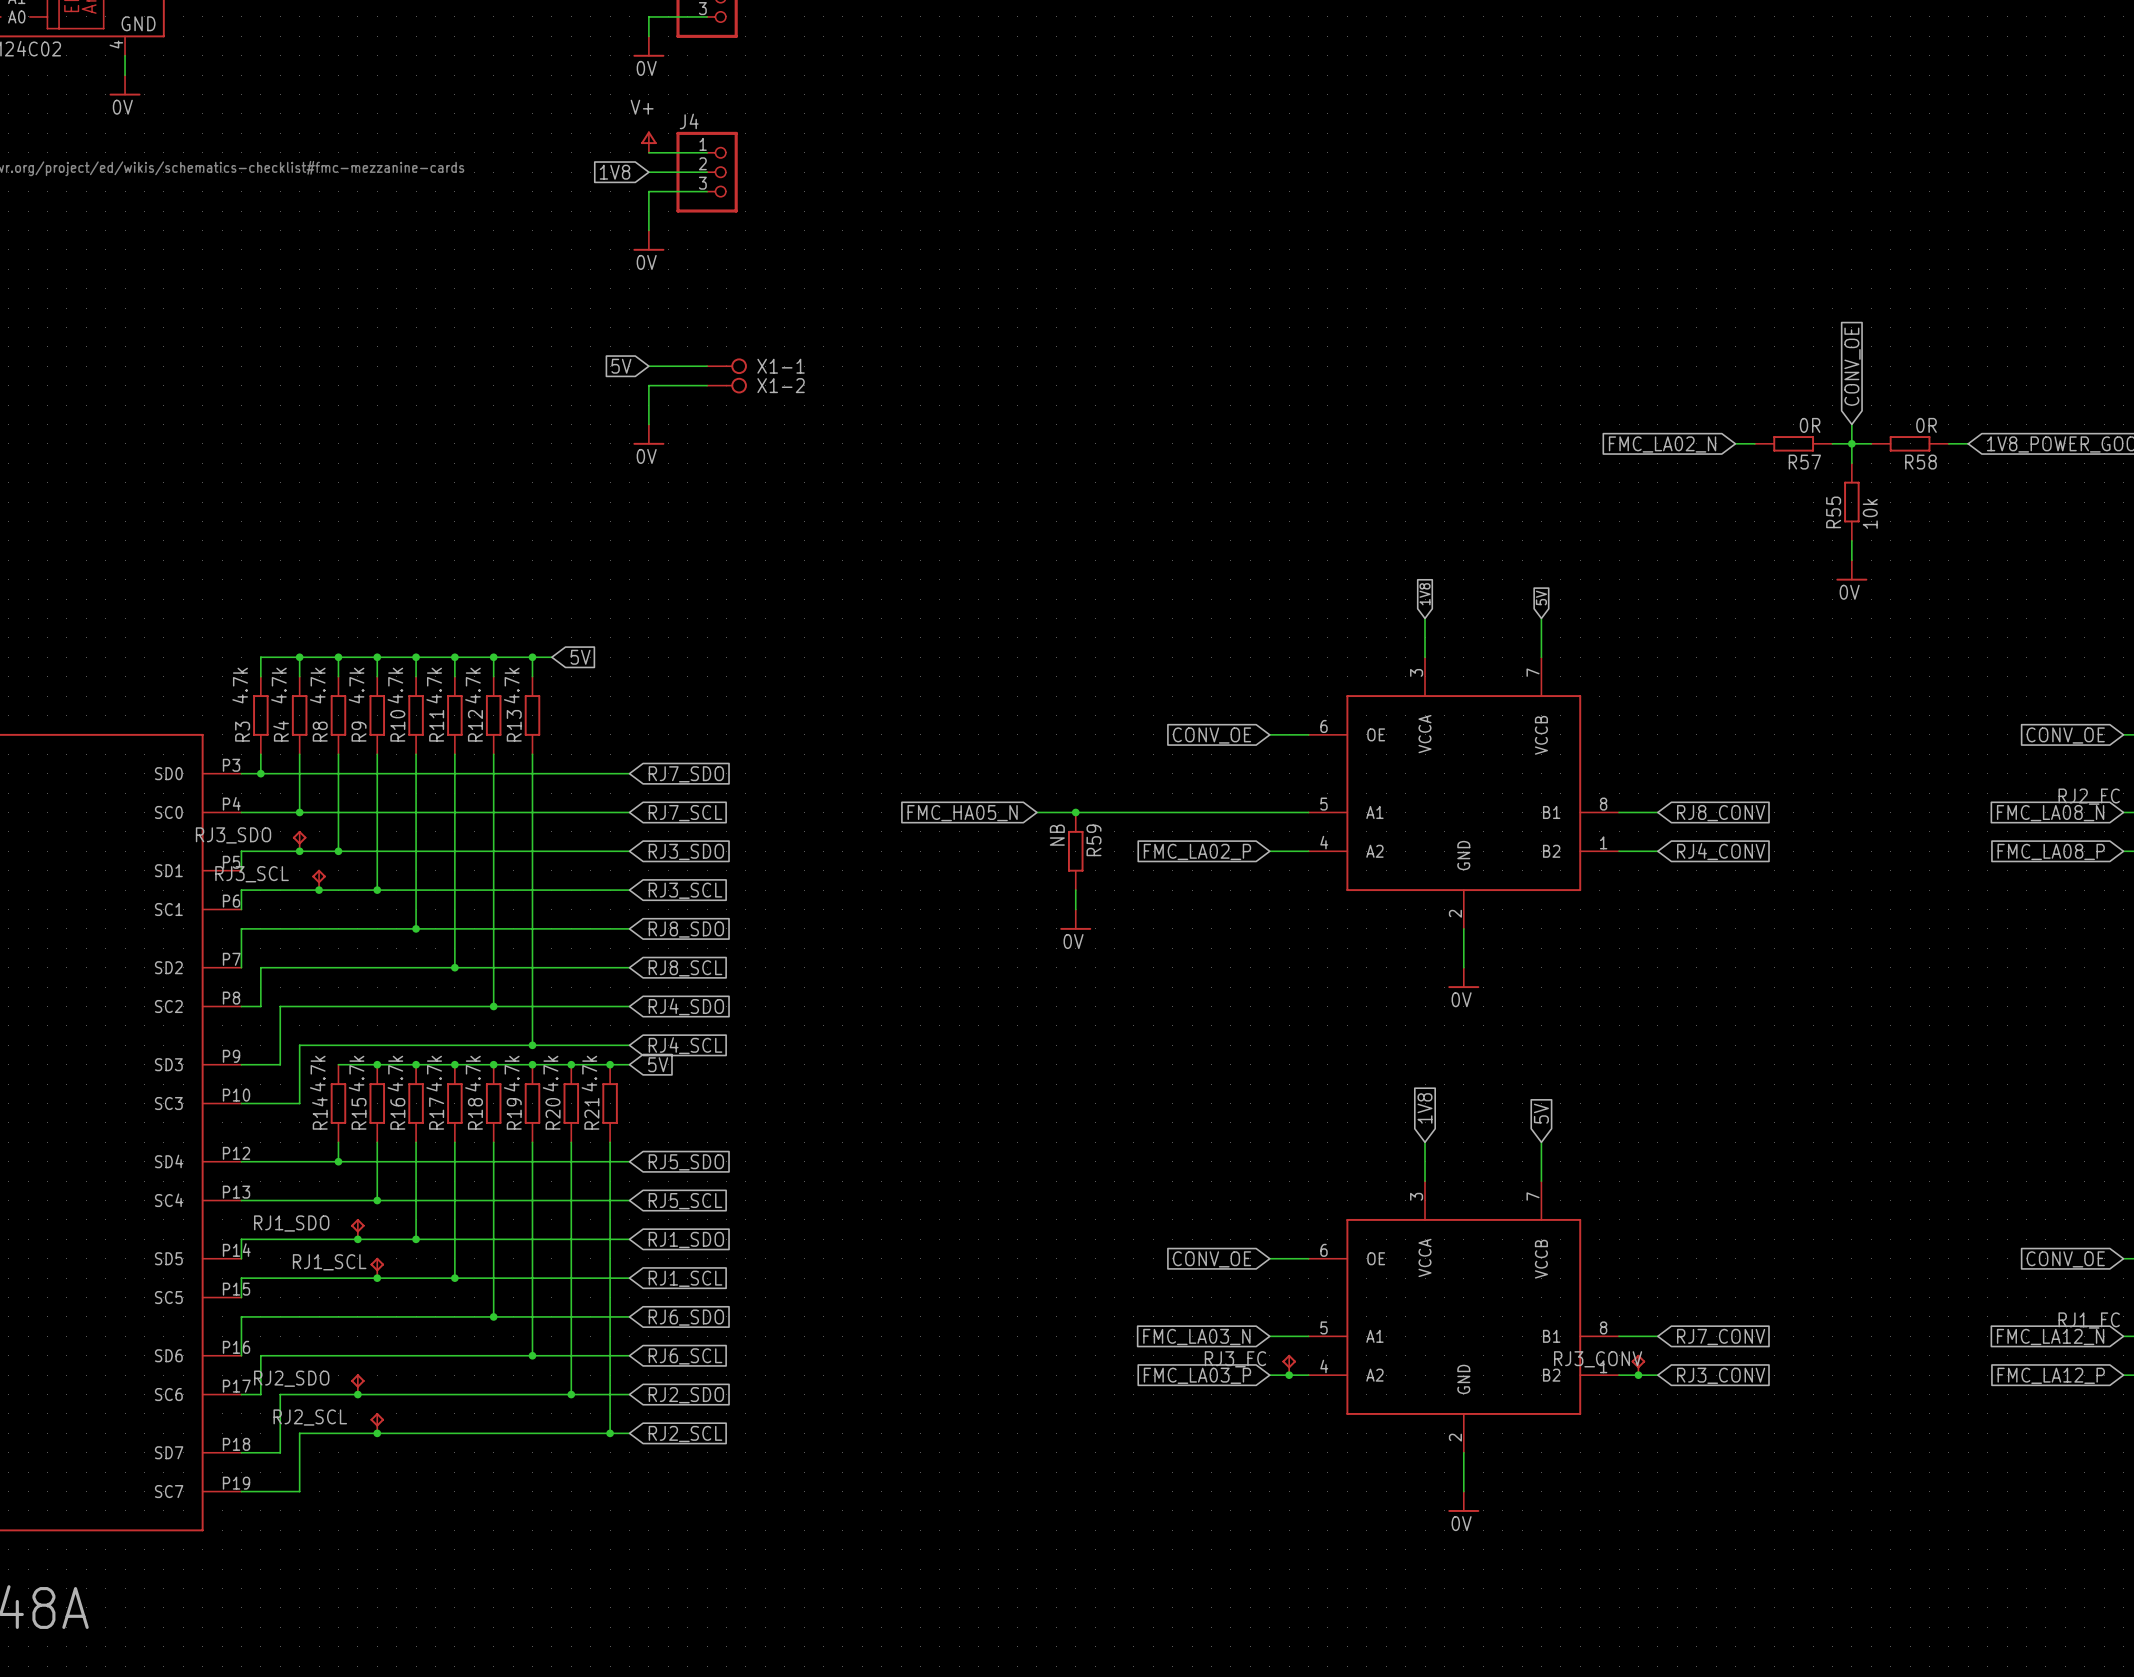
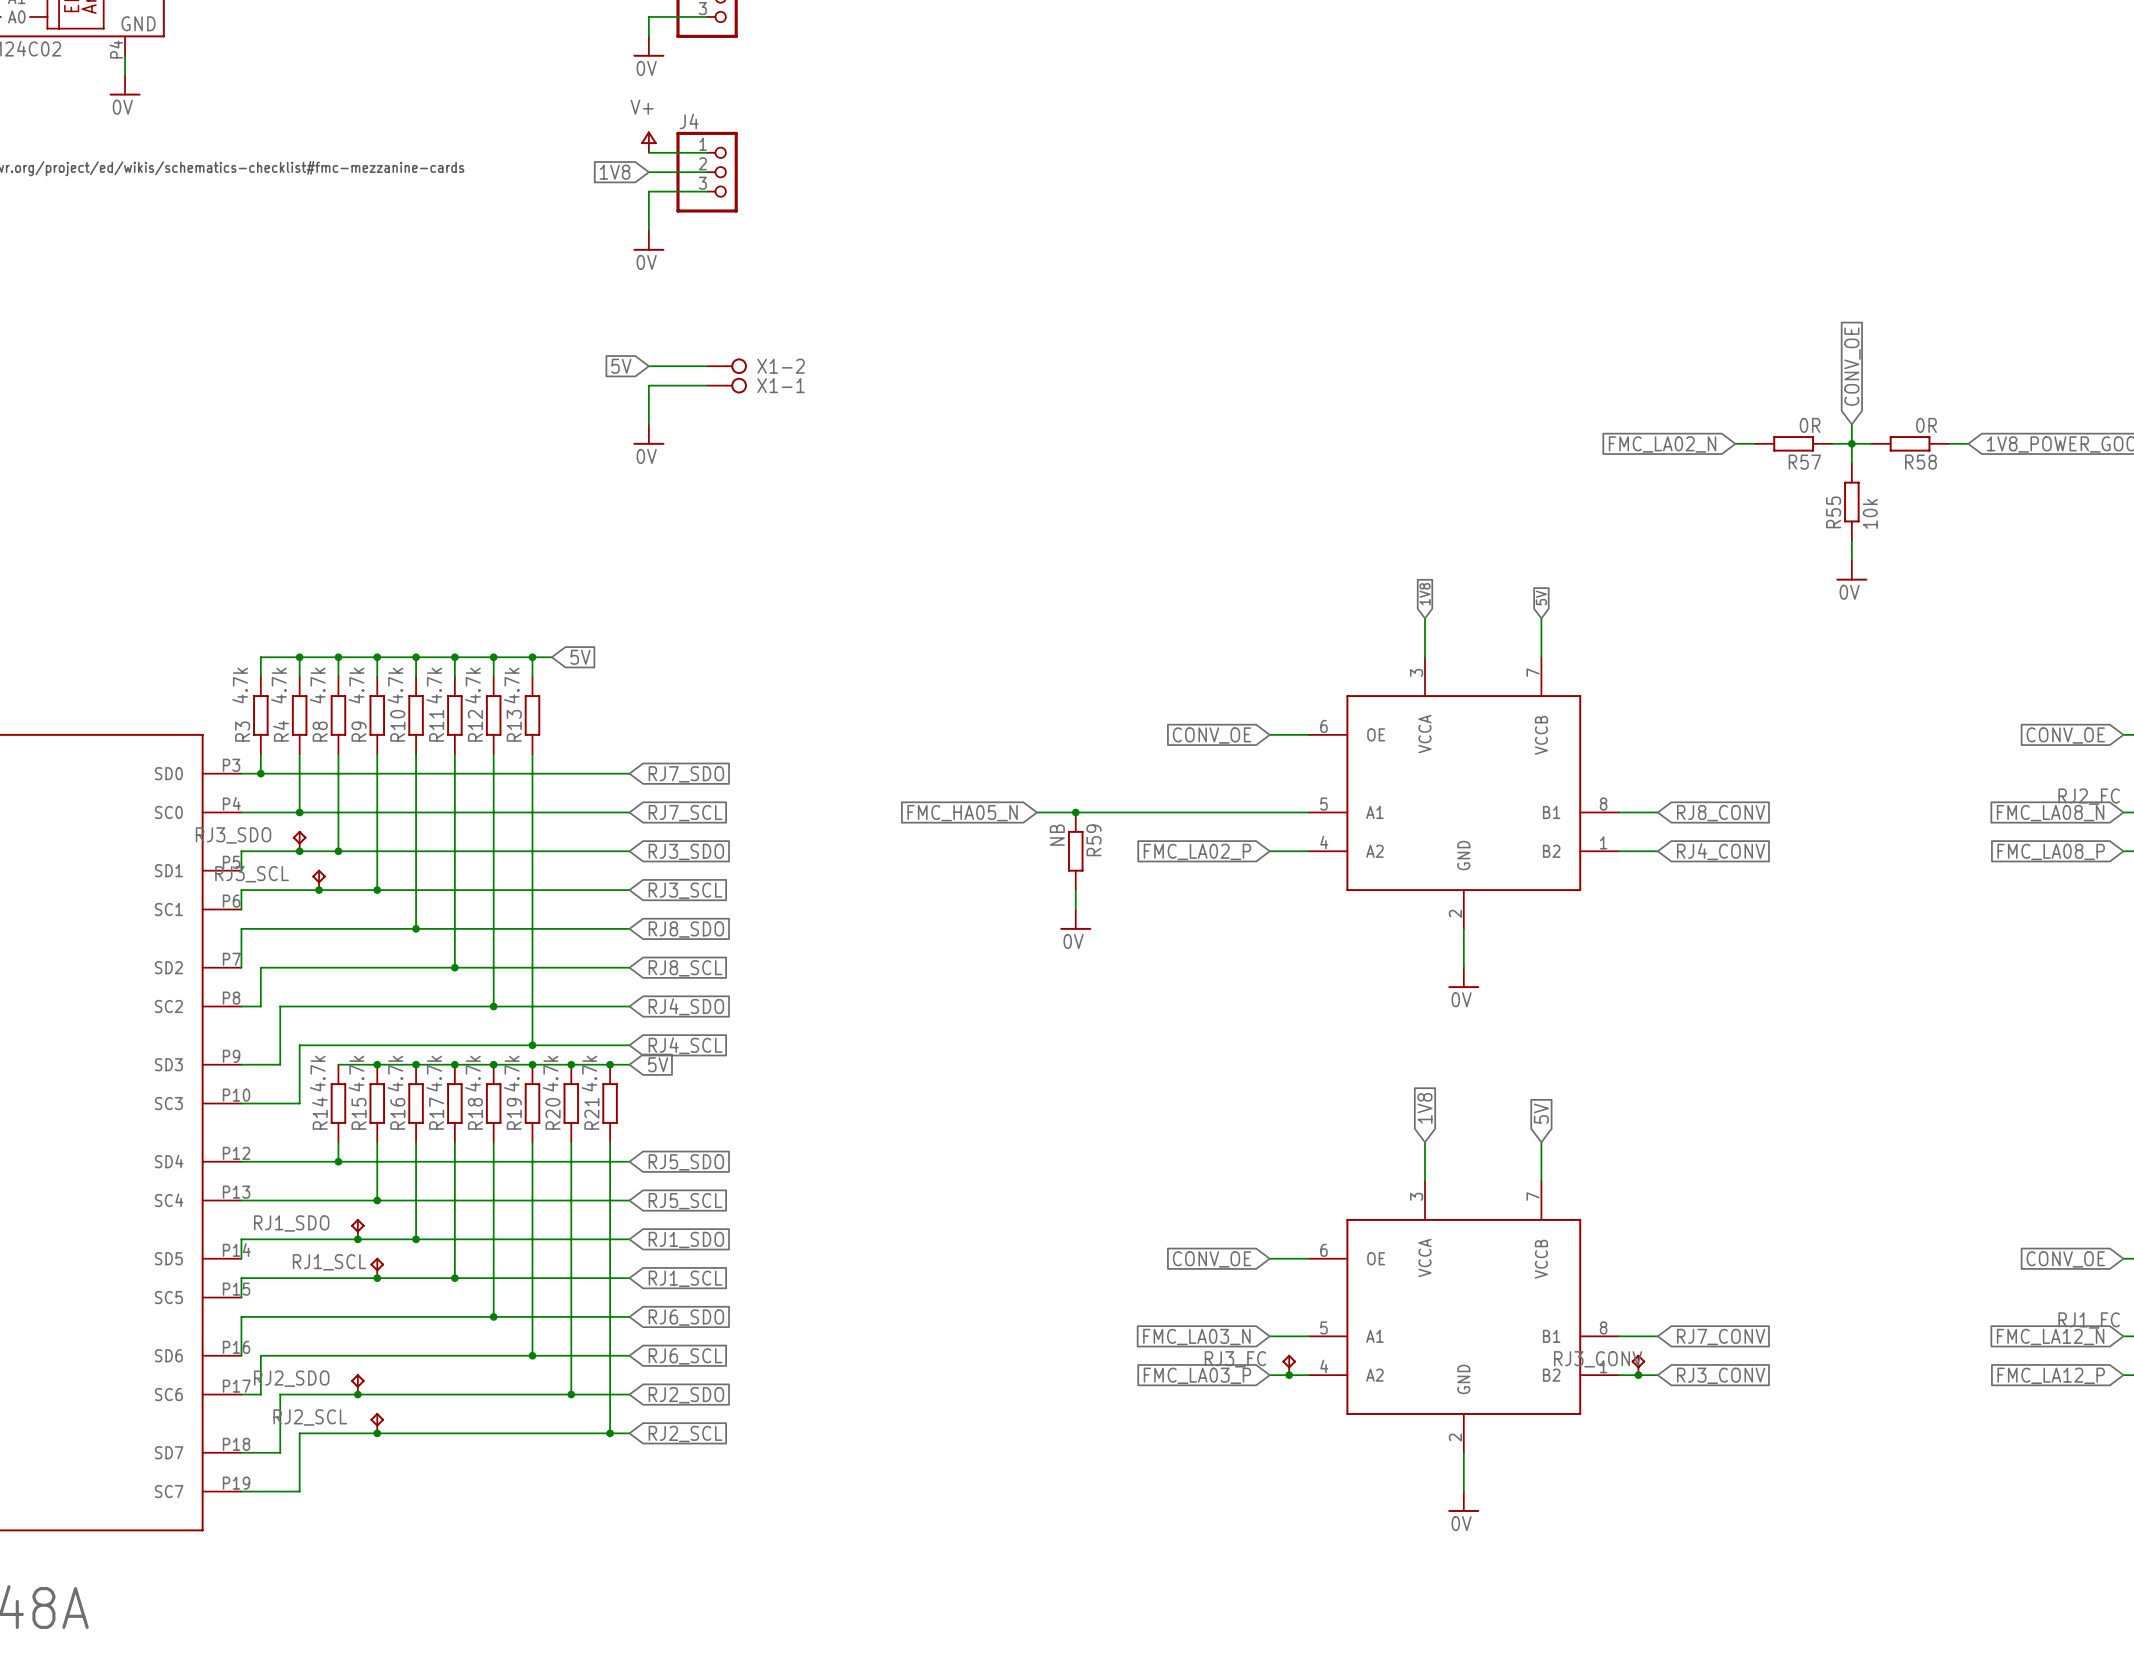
part pin number: 4 (116, 44) -> P4 (116, 49)
X1-1 name: X1-1 (781, 366) -> X1-2 (781, 366)
X1-2 name: X1-2 (781, 385) -> X1-1 (781, 385)

